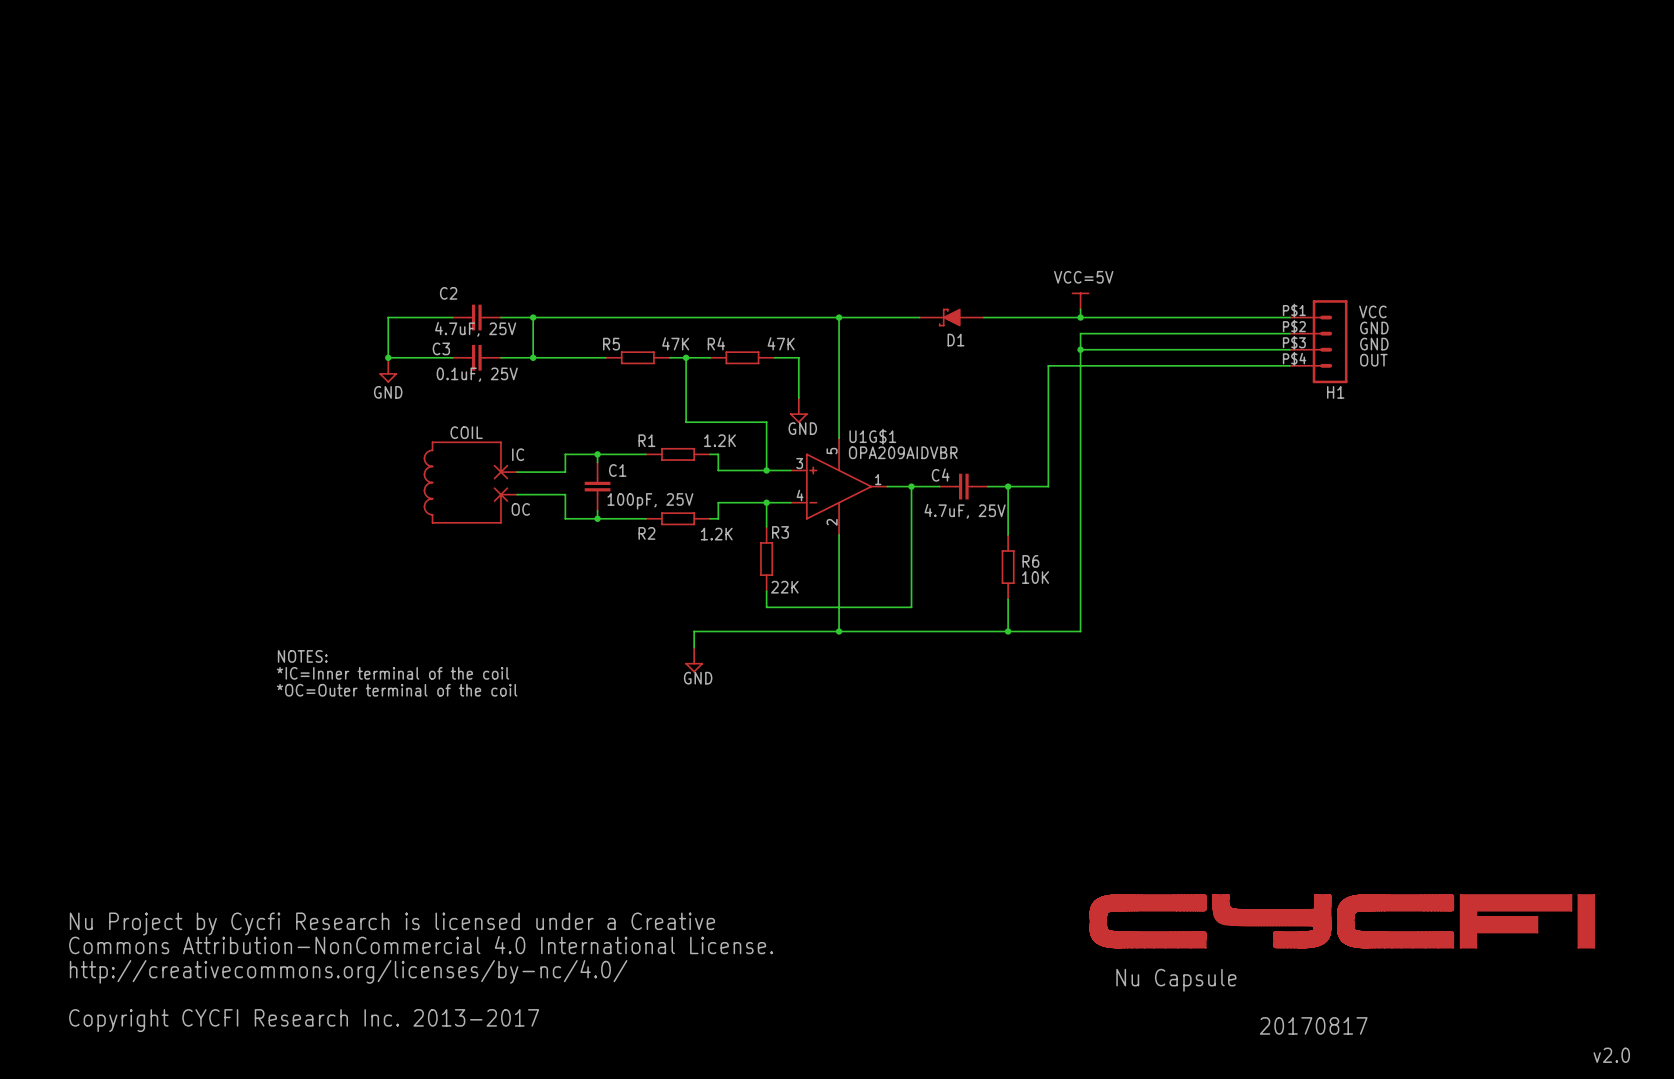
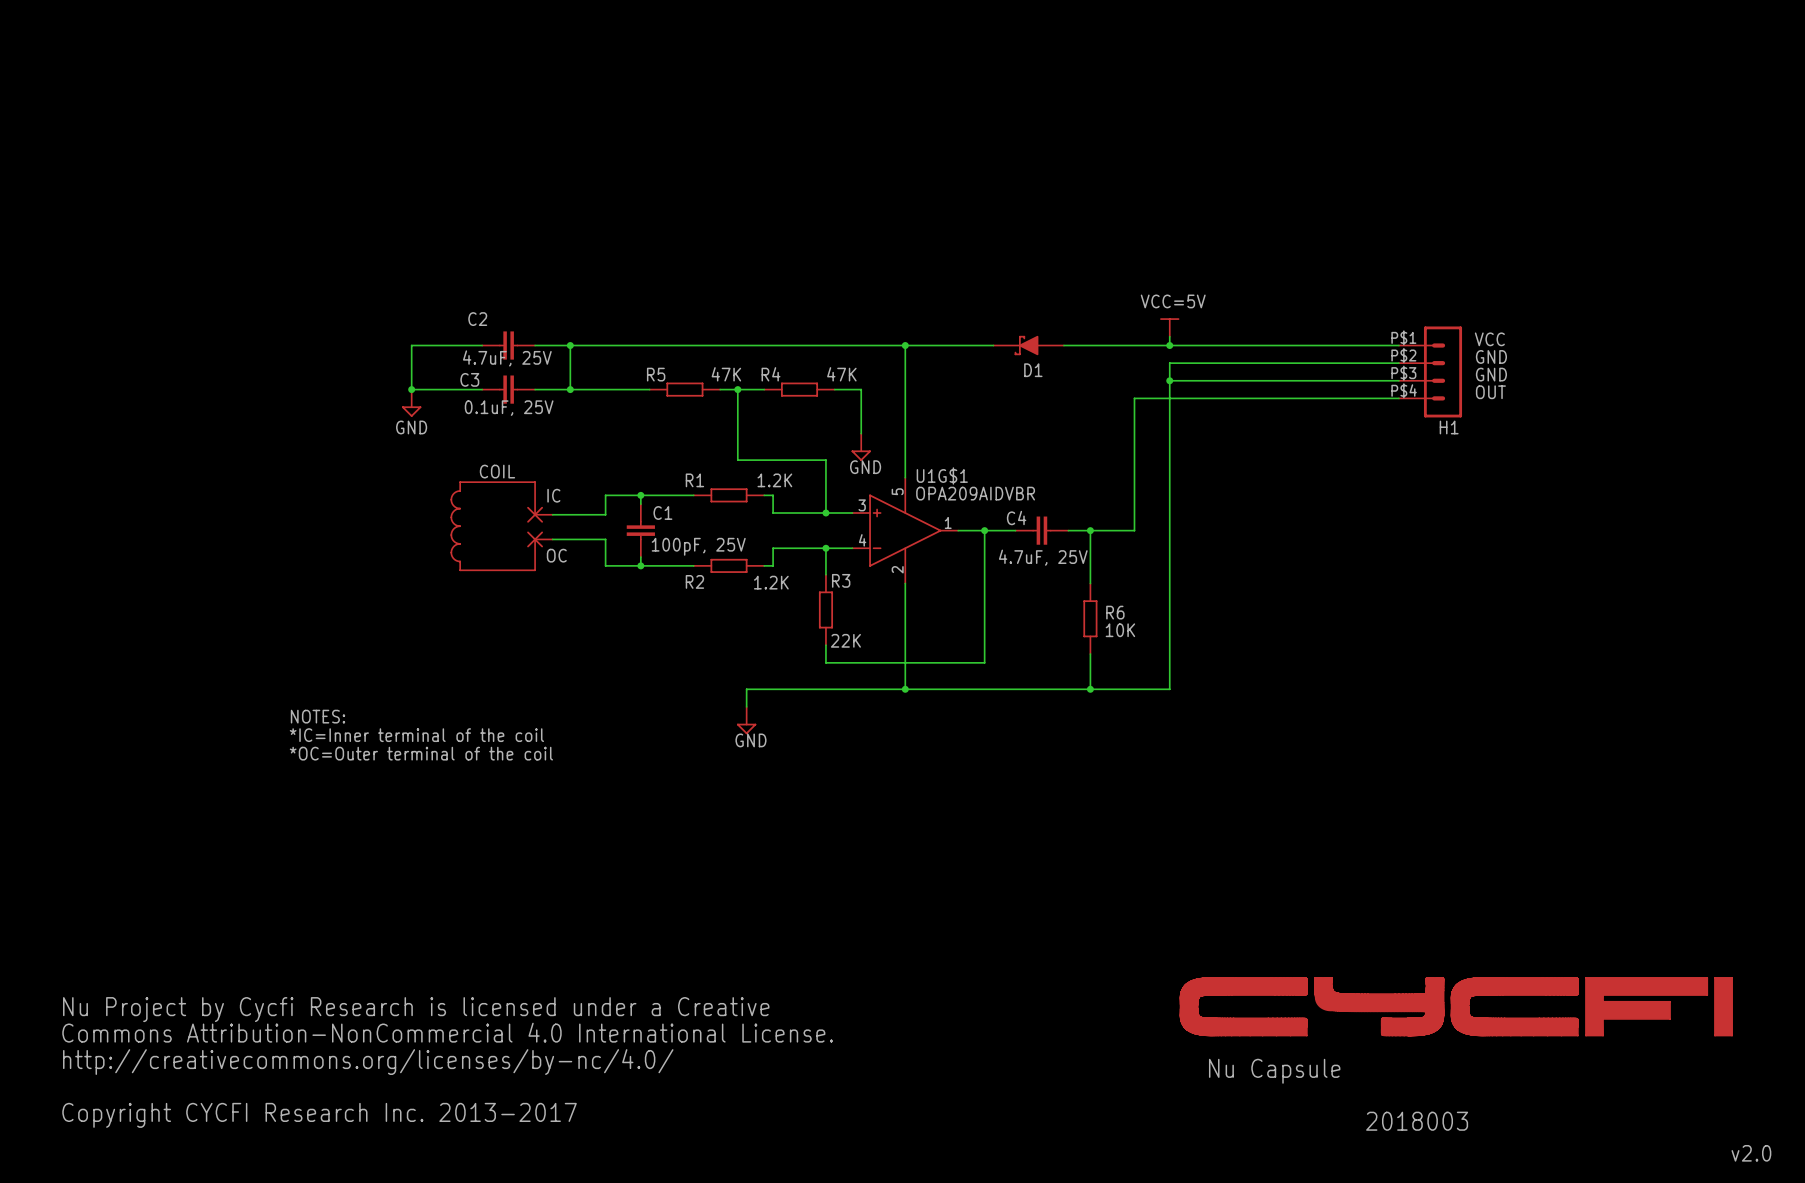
text: 20170817 (1313, 1025) -> 2018003 (1417, 1121)

